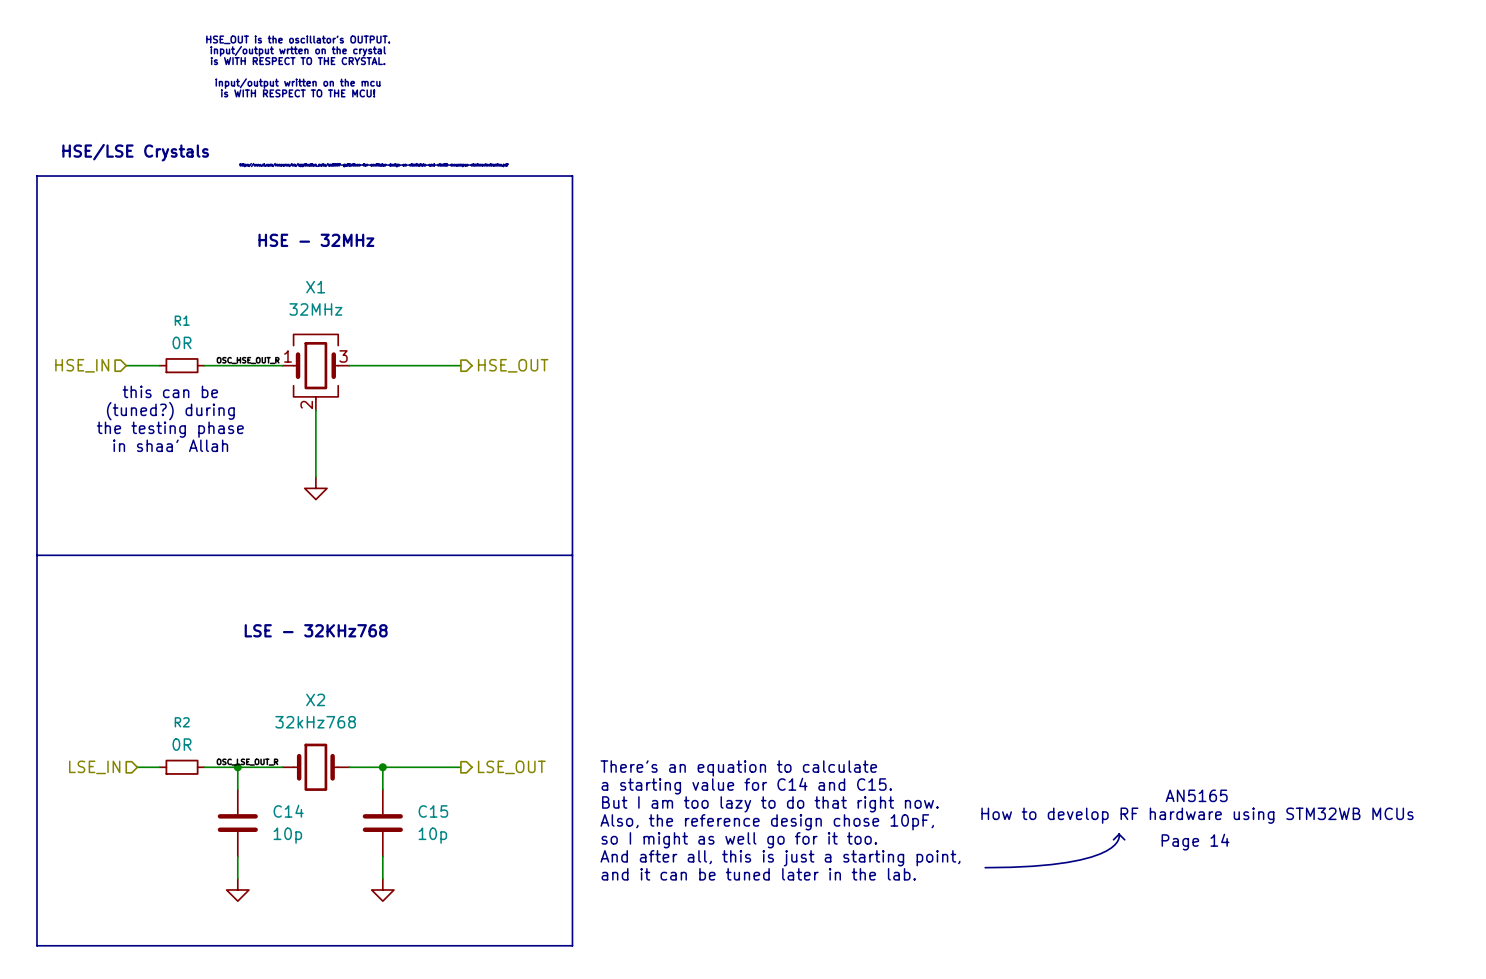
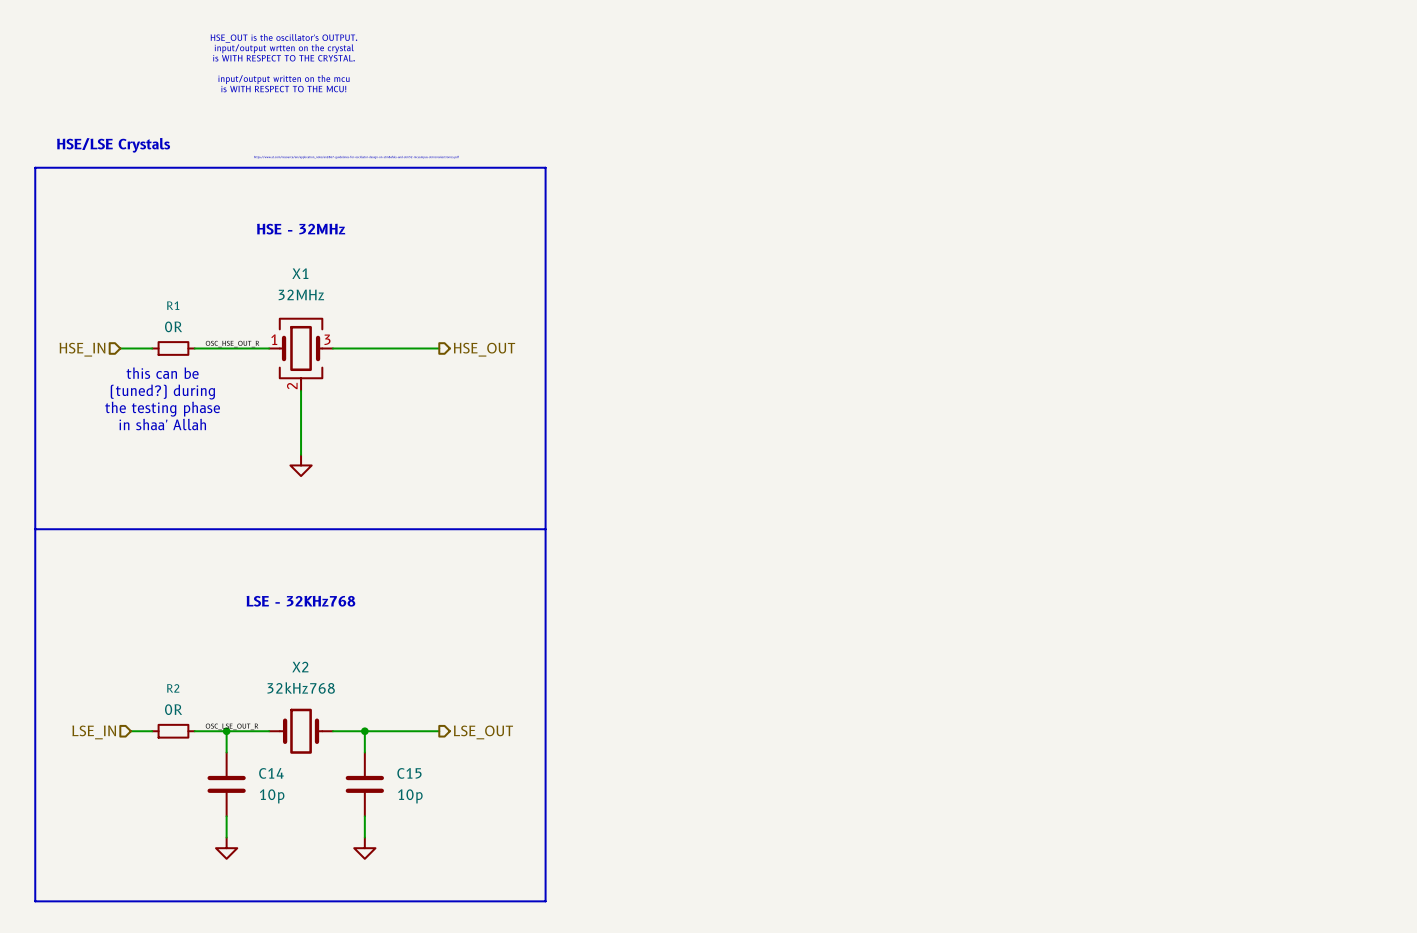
text: There's an equation to calculate (738, 768) -> none
text: a starting value for C14 and C15. (746, 786) -> none
text: AN5165 (1196, 795) -> none
text: But I am too lazy to do that right now. (770, 804) -> none
text: How to develop RF hardware using STM32WB MCUs (1197, 815) -> none
text: Also, the reference design chose 10pF, (767, 822) -> none
line: (1119, 834) (1124, 839) -> none
line: (1119, 834) (1113, 839) -> none
line: (1119, 834) (1117, 841) (1111, 847) (1099, 854) (1080, 859) (1032, 866) (985, 867) -> none
text: so I might as well go for it too. (739, 840) -> none
text: Page 14 (1195, 842) -> none
text: And after all, this is just a starting point, (780, 858) -> none
text: and it can be tuned later in the lab. (758, 874) -> none

